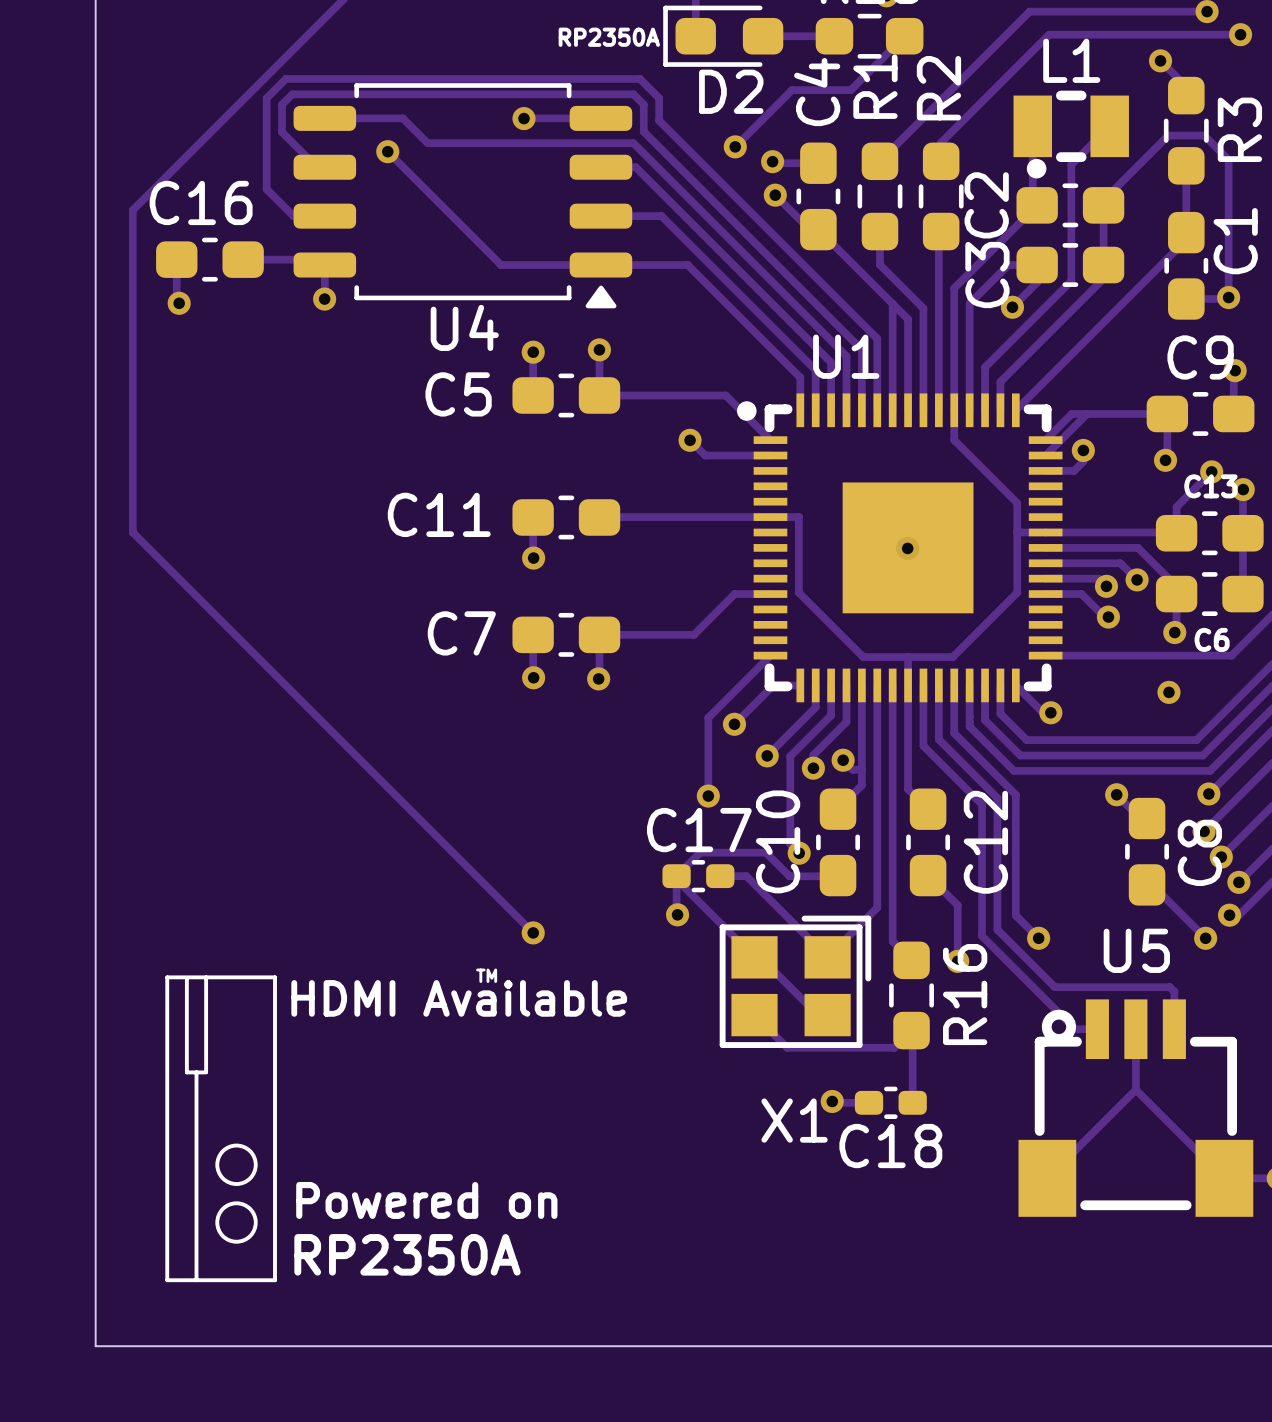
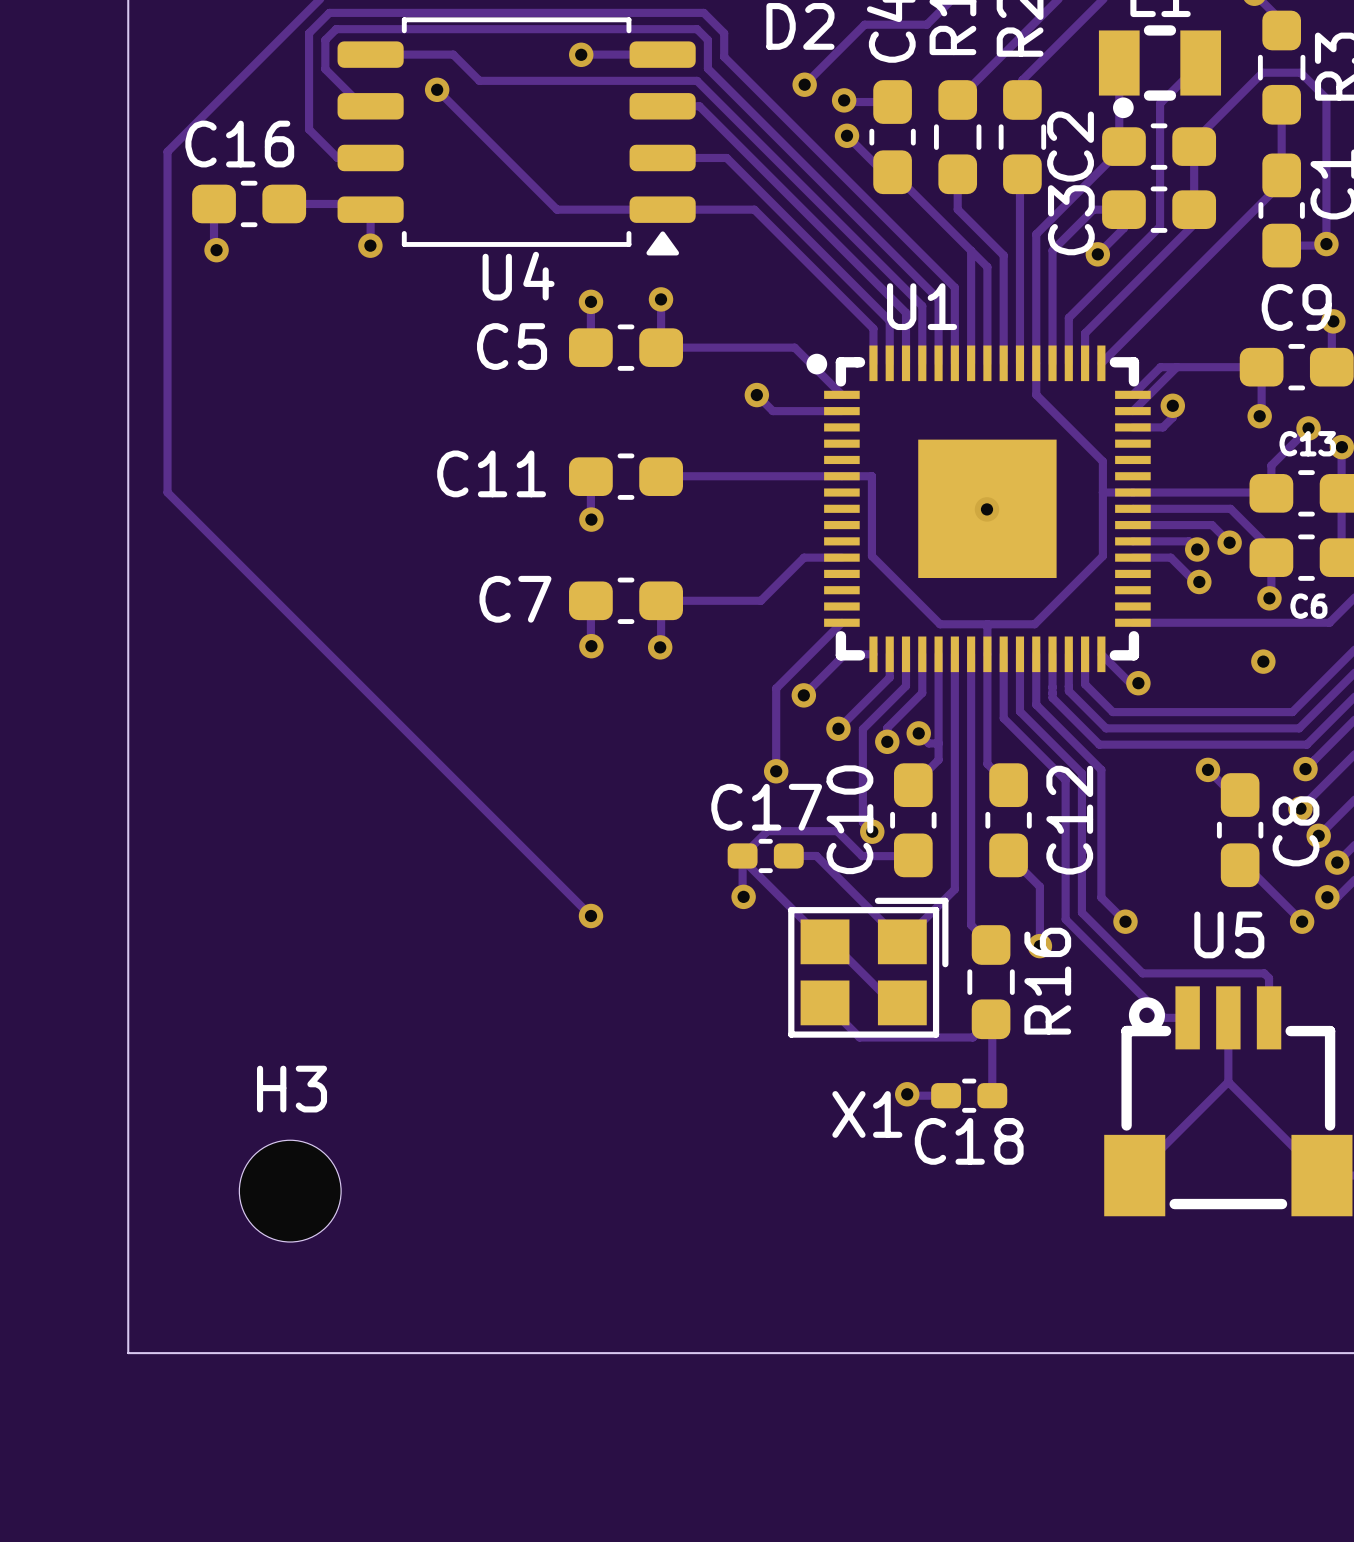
text: TM (486, 975) -> none
line: (167, 977) (275, 977) (275, 1280) (167, 1280) (167, 977) -> none
line: (206, 977) (206, 1071) -> none
line: (186, 978) (186, 1072) (206, 1072) -> none
text: HDMI Available (459, 998) -> none
line: (196, 1072) (196, 1280) -> none
drawing: [215, 1143, 258, 1244] -> none
H3: none -> (290, 1191)
text: Powered on (426, 1200) -> none
text: RP2350A (407, 1254) -> none

